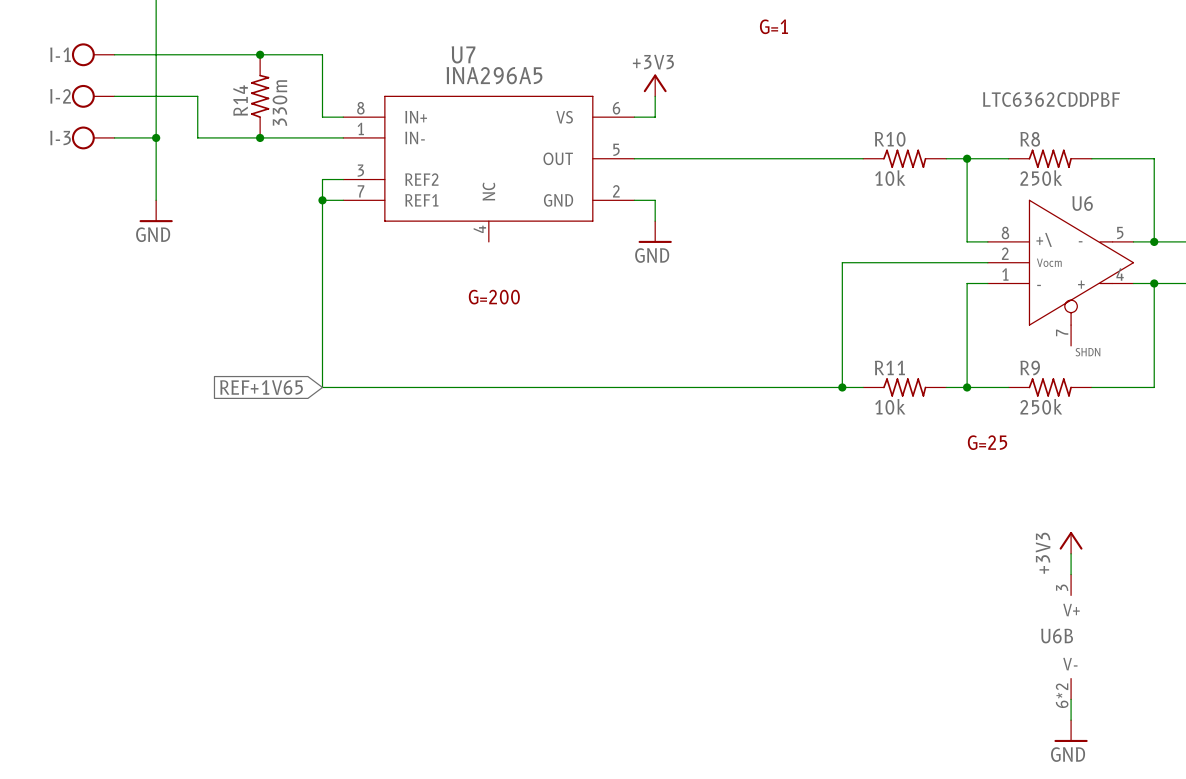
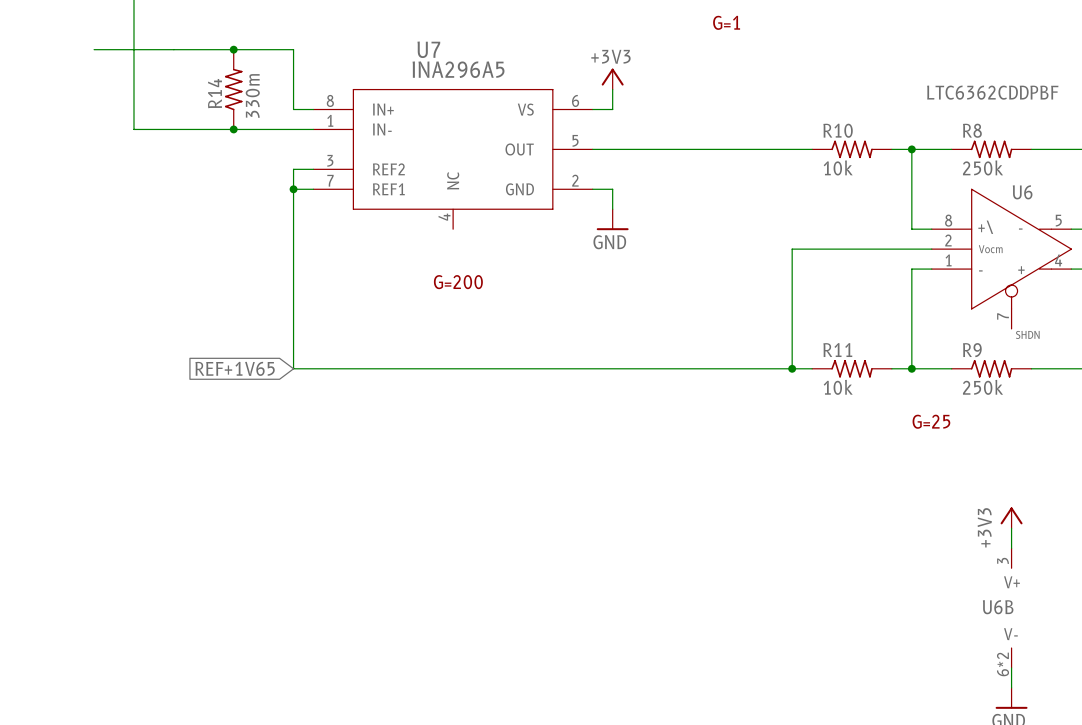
I-1: (93, 54) -> none
I-2: (93, 96) -> none
wire: (114, 96) (197, 96) (197, 137) -> (133, 129) (173, 129)
I-3: (93, 137) -> none
wire: (114, 137) (156, 137) (156, 200) -> none
junction: (156, 137) -> none
power symbol: GND (156, 211) -> none

